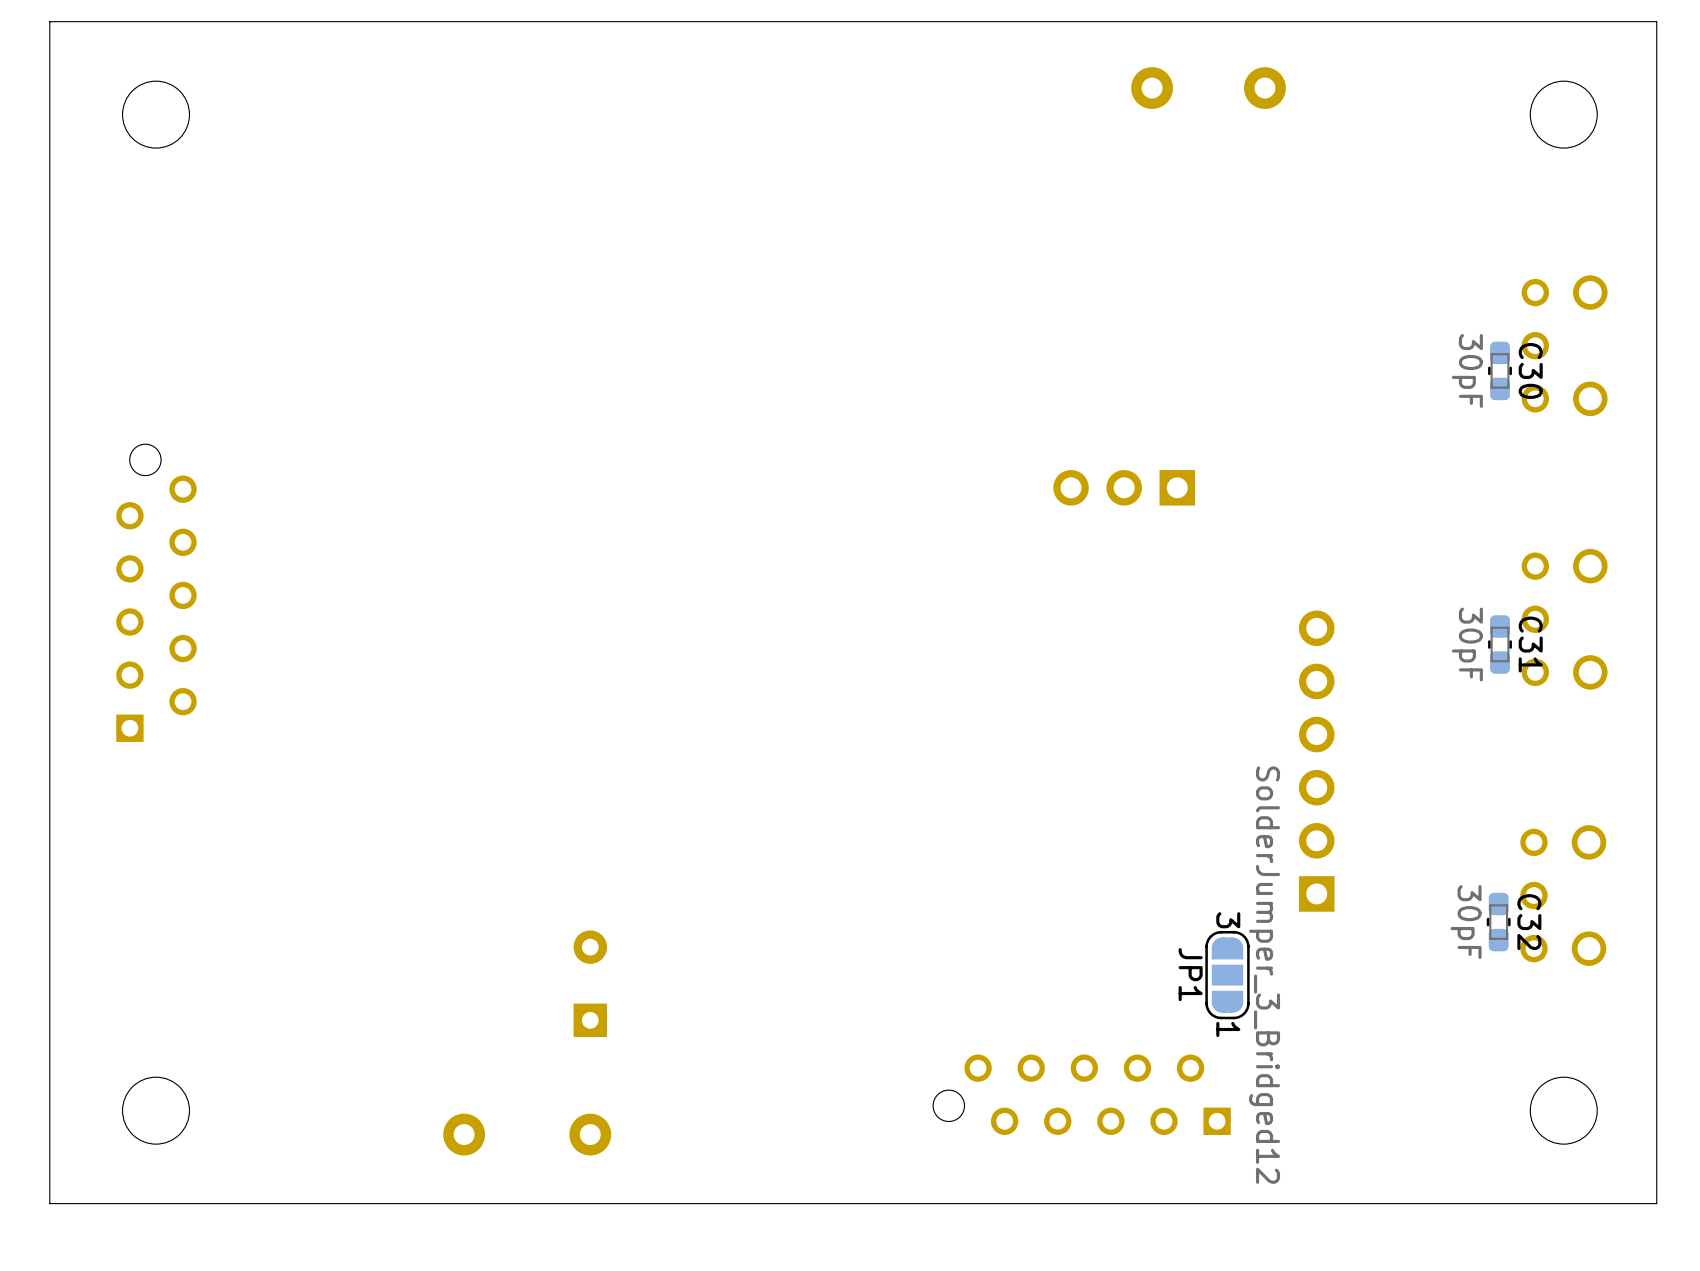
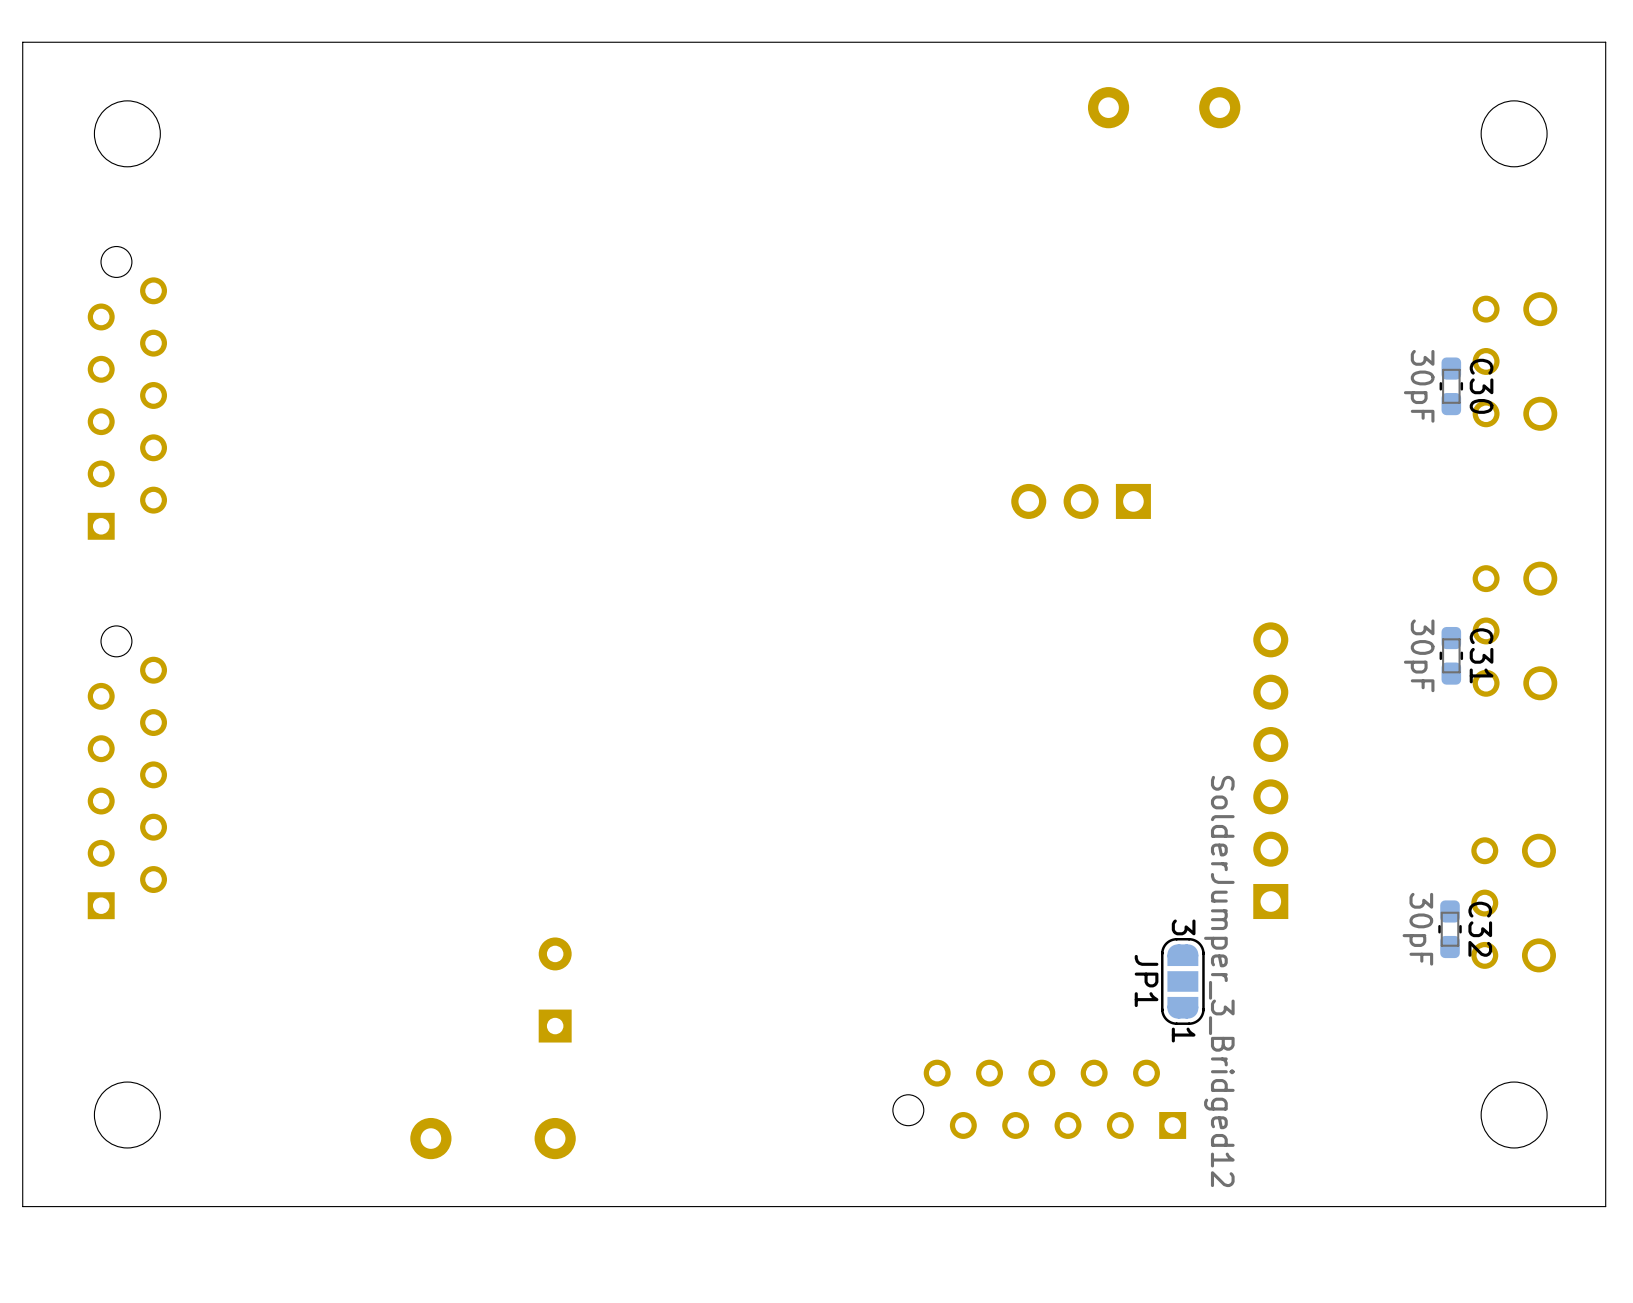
part: none -> (127, 393)
part: (156, 593) -> none
part: none -> (127, 772)

